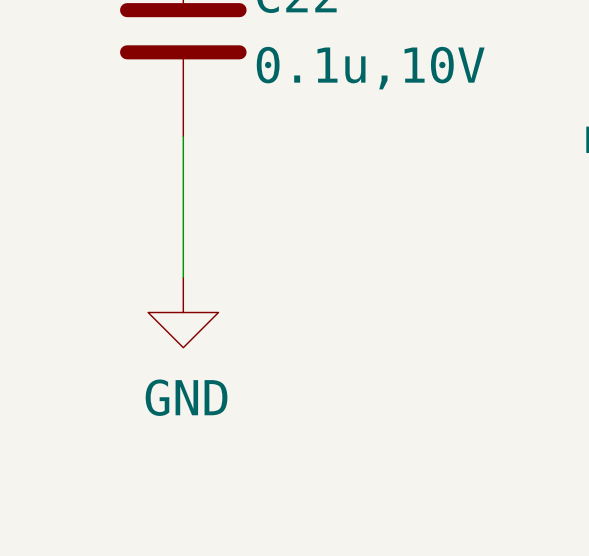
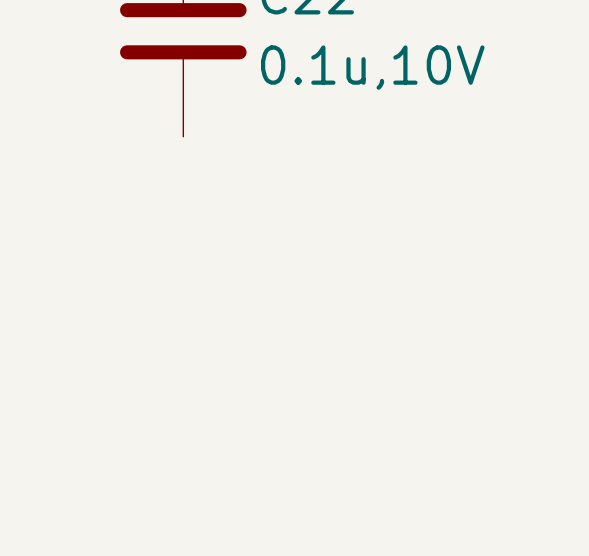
wire: (183, 136) (183, 277) -> none
power symbol: GND (183, 312) -> none

